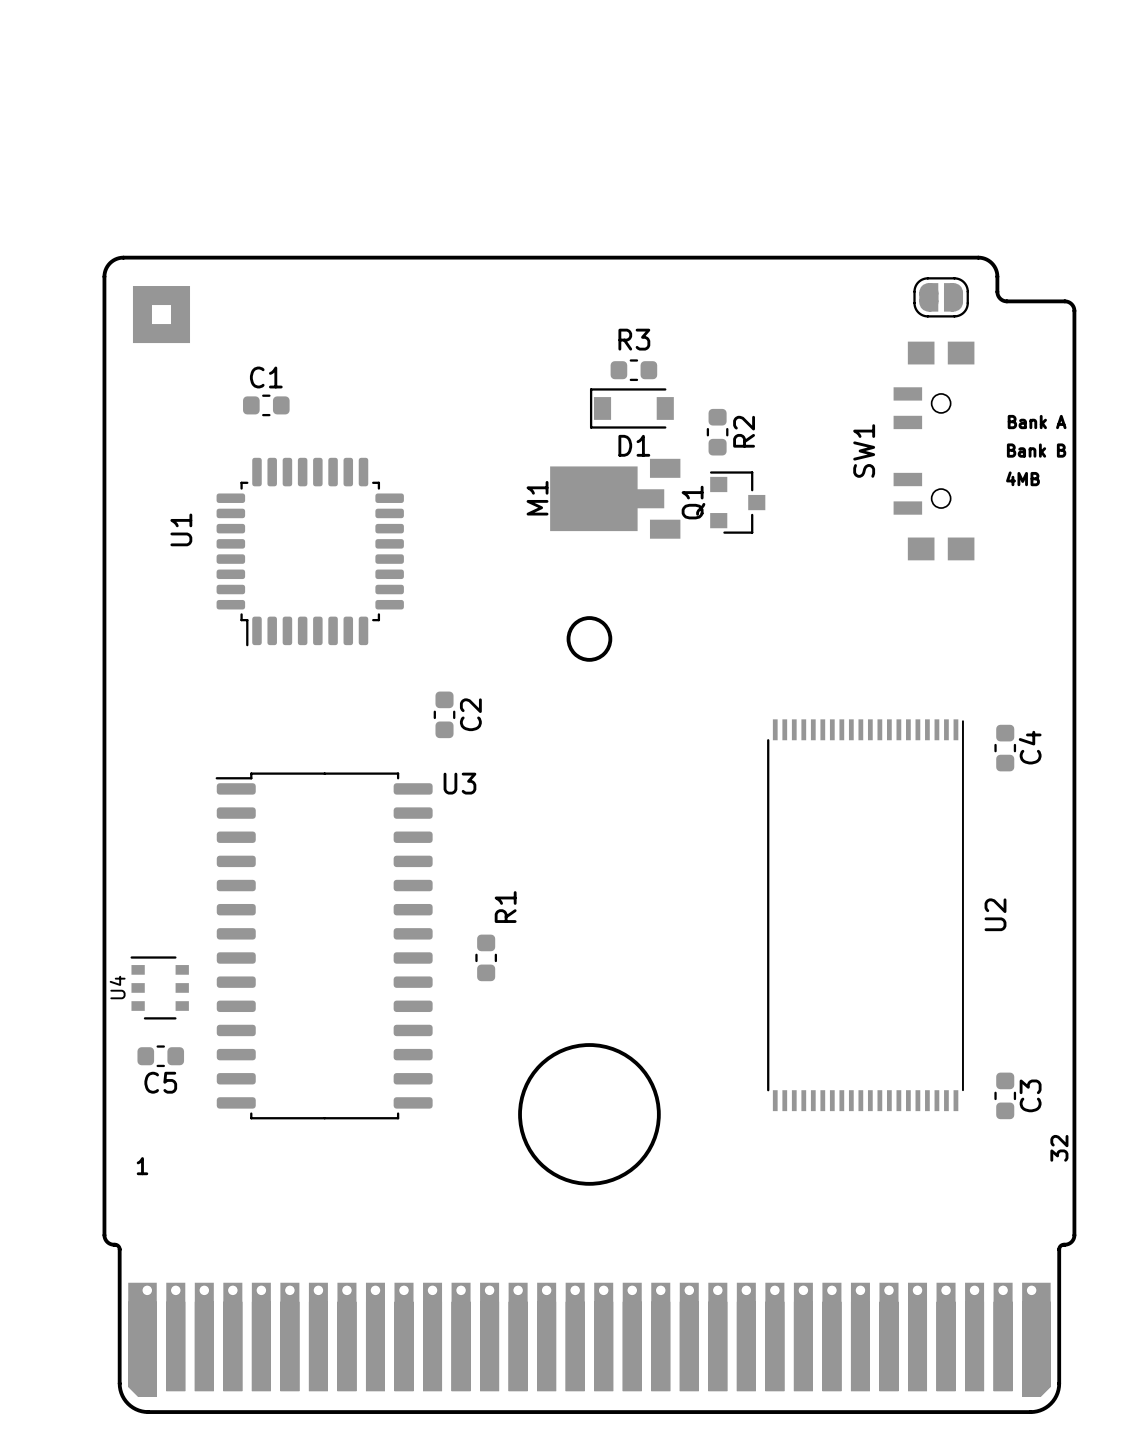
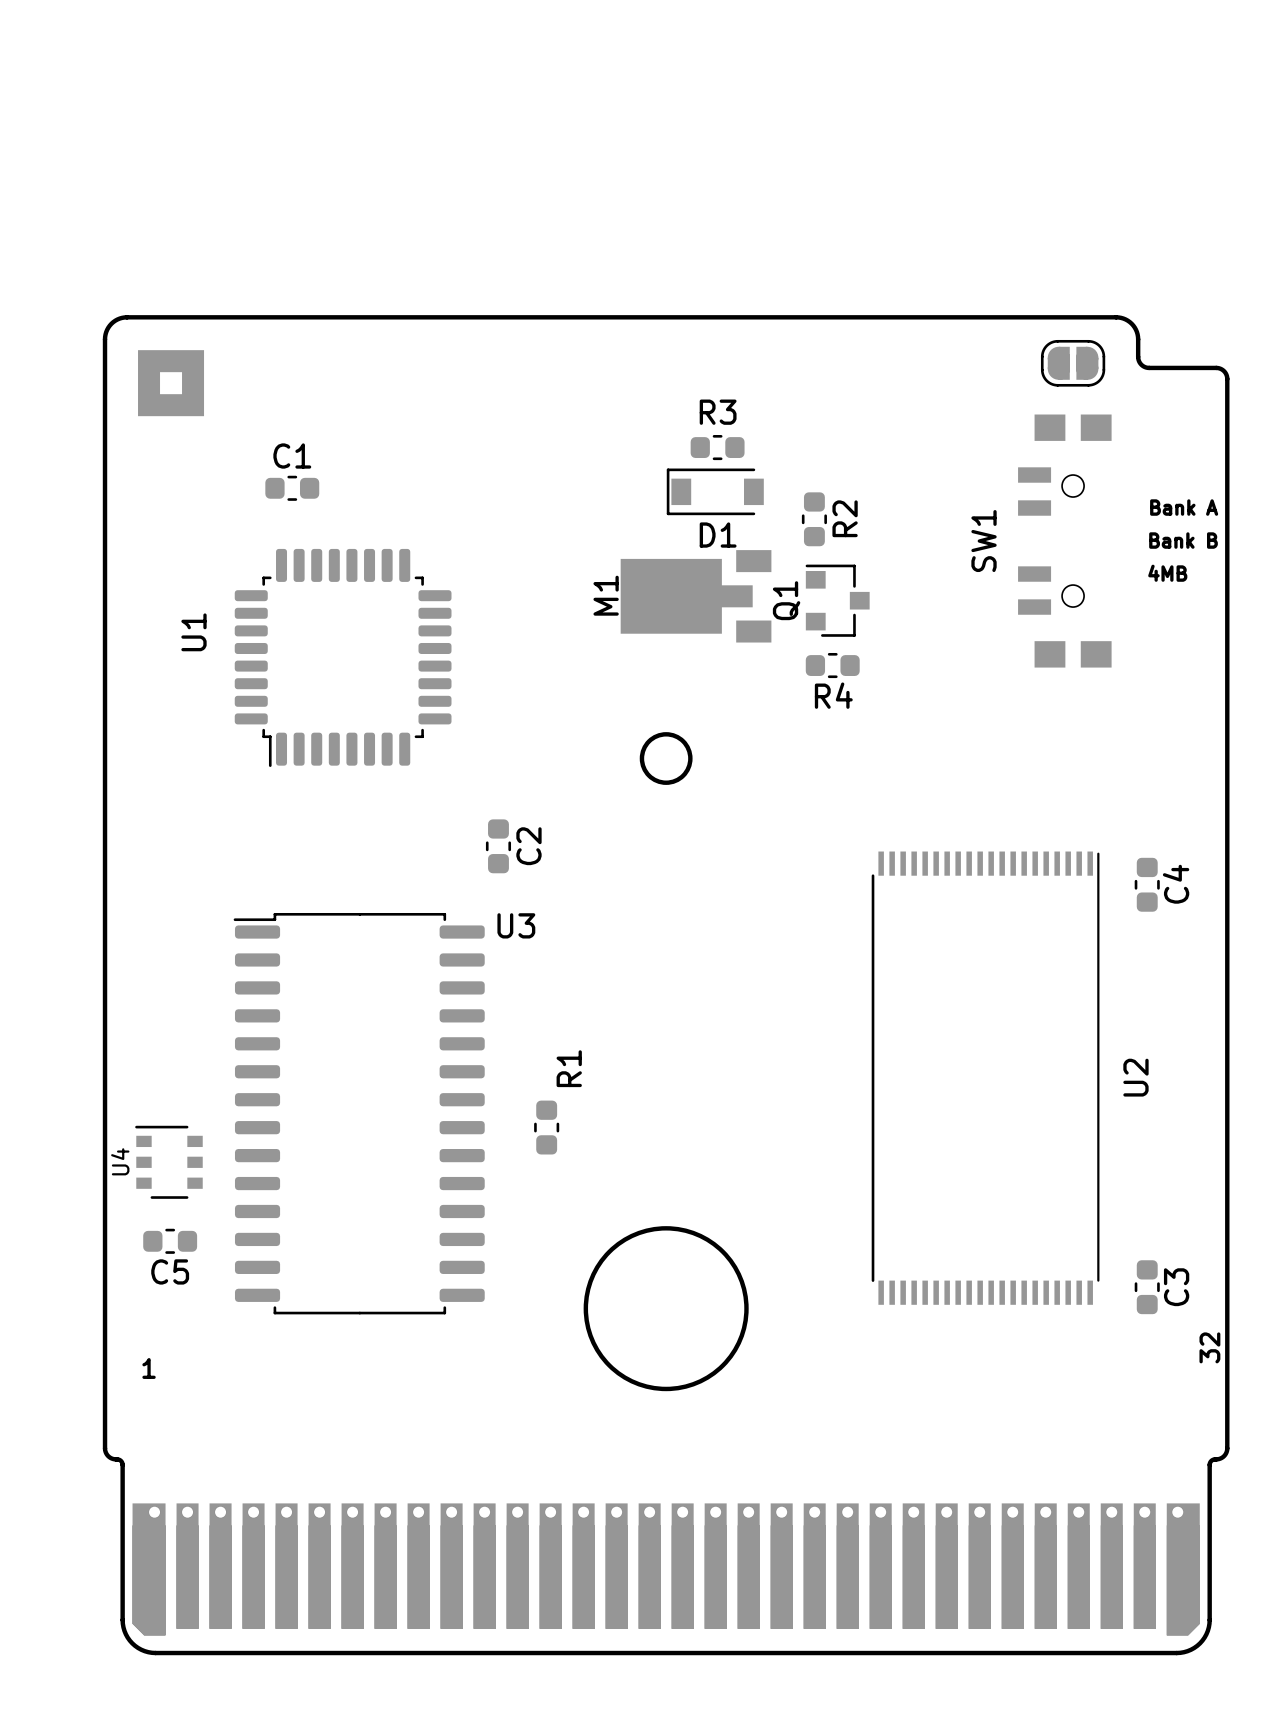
R4: none -> (832, 665)

